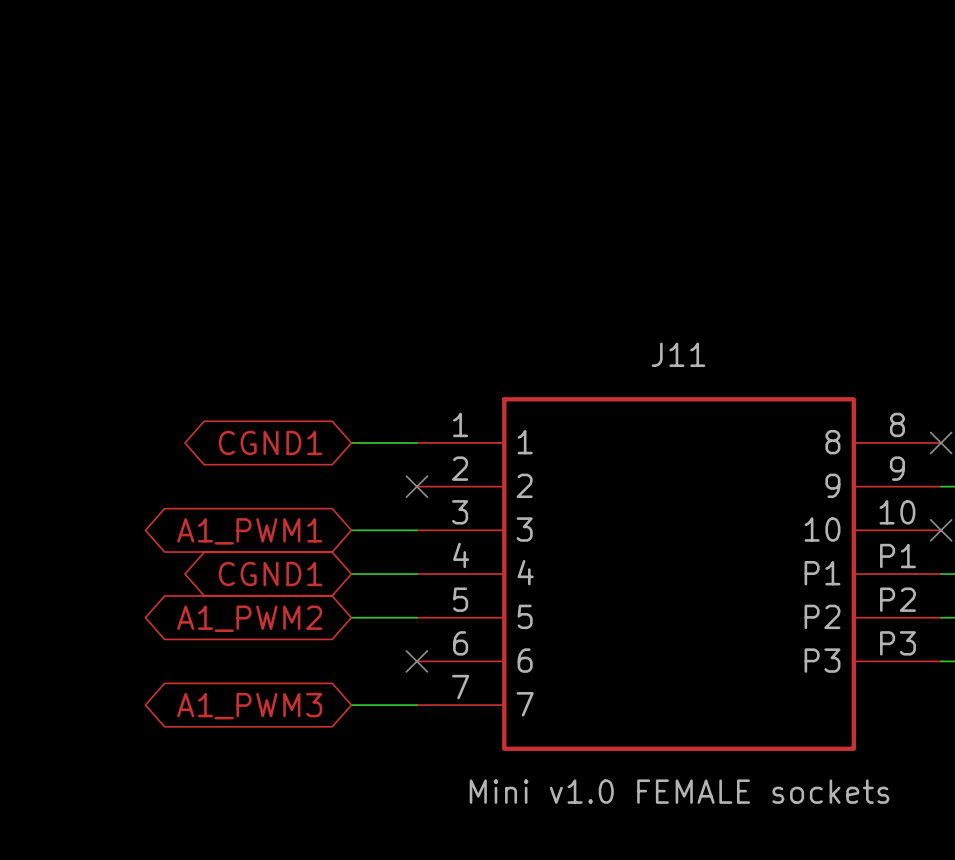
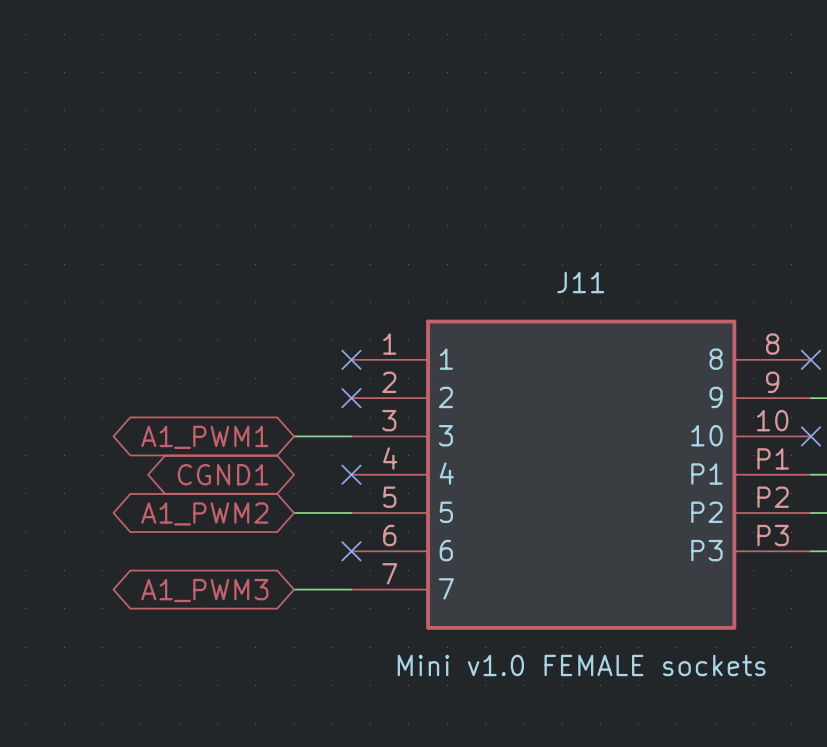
global label: CGND1 (270, 442) -> none
wire: (351, 442) (416, 442) -> none
no-connect mark: none -> (351, 359)
wire: (351, 574) (416, 574) -> none
no-connect mark: none -> (351, 474)

